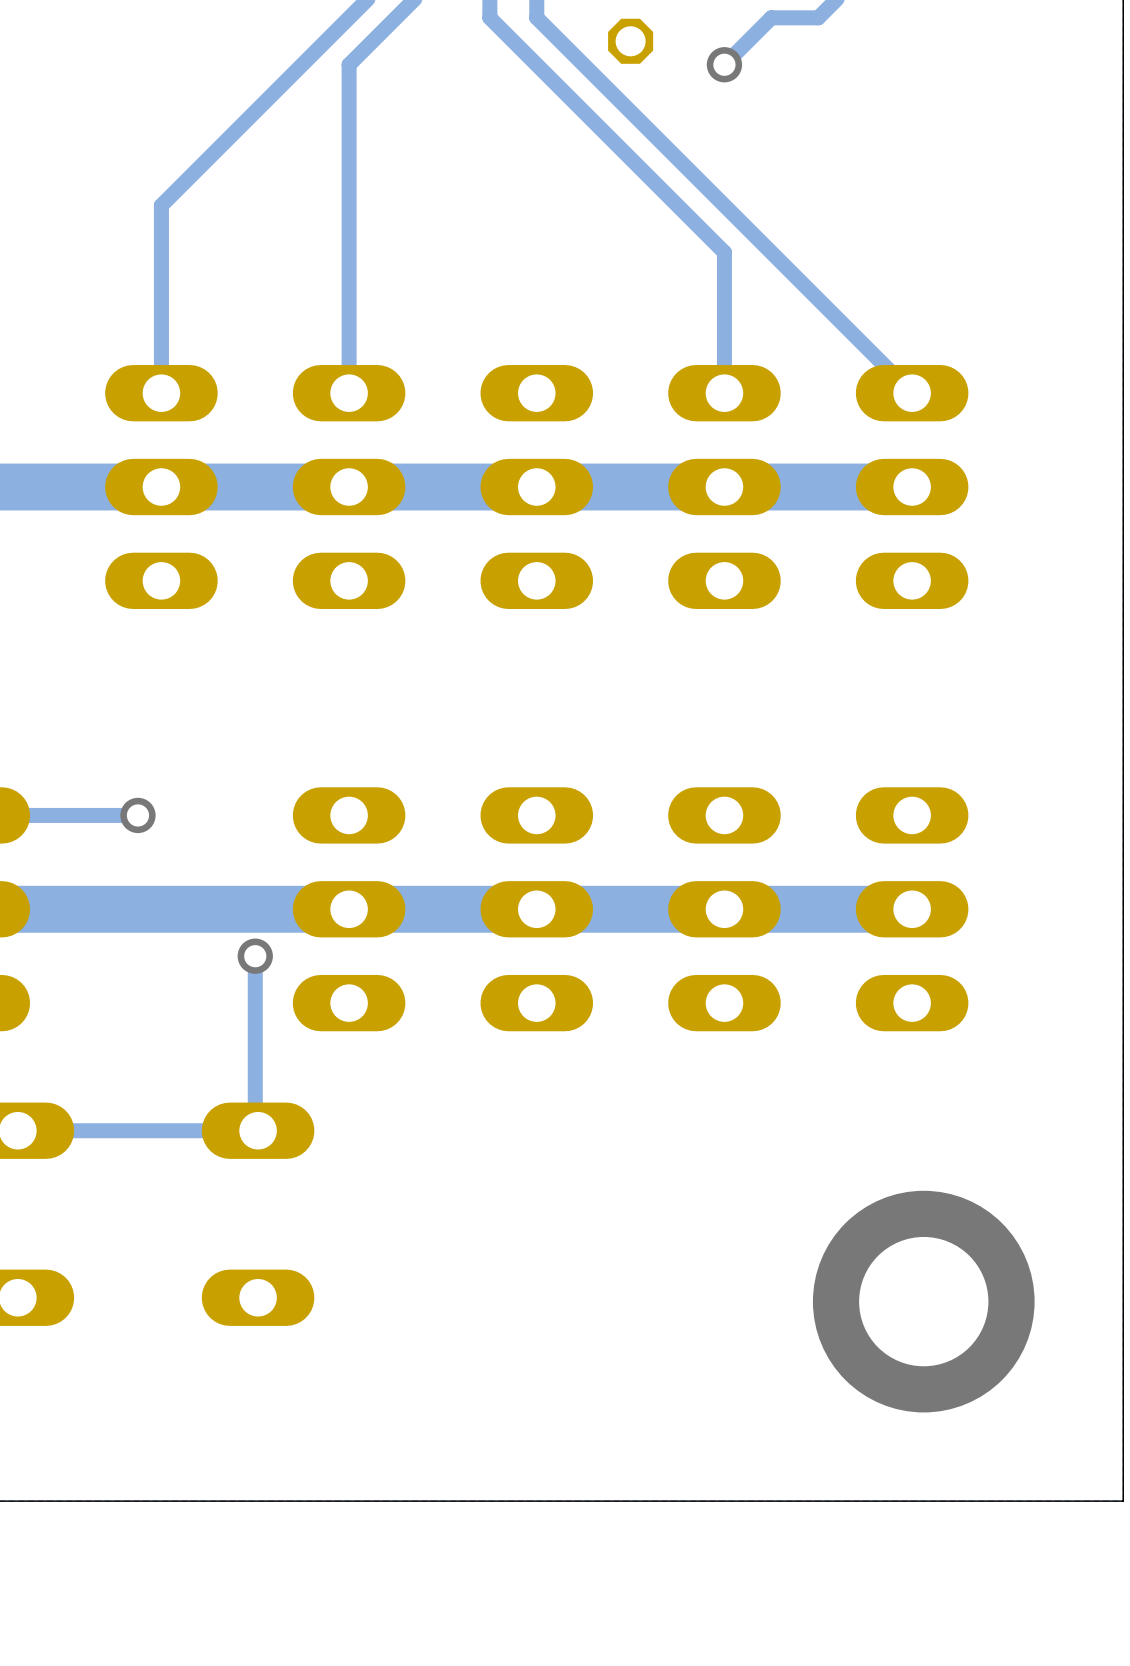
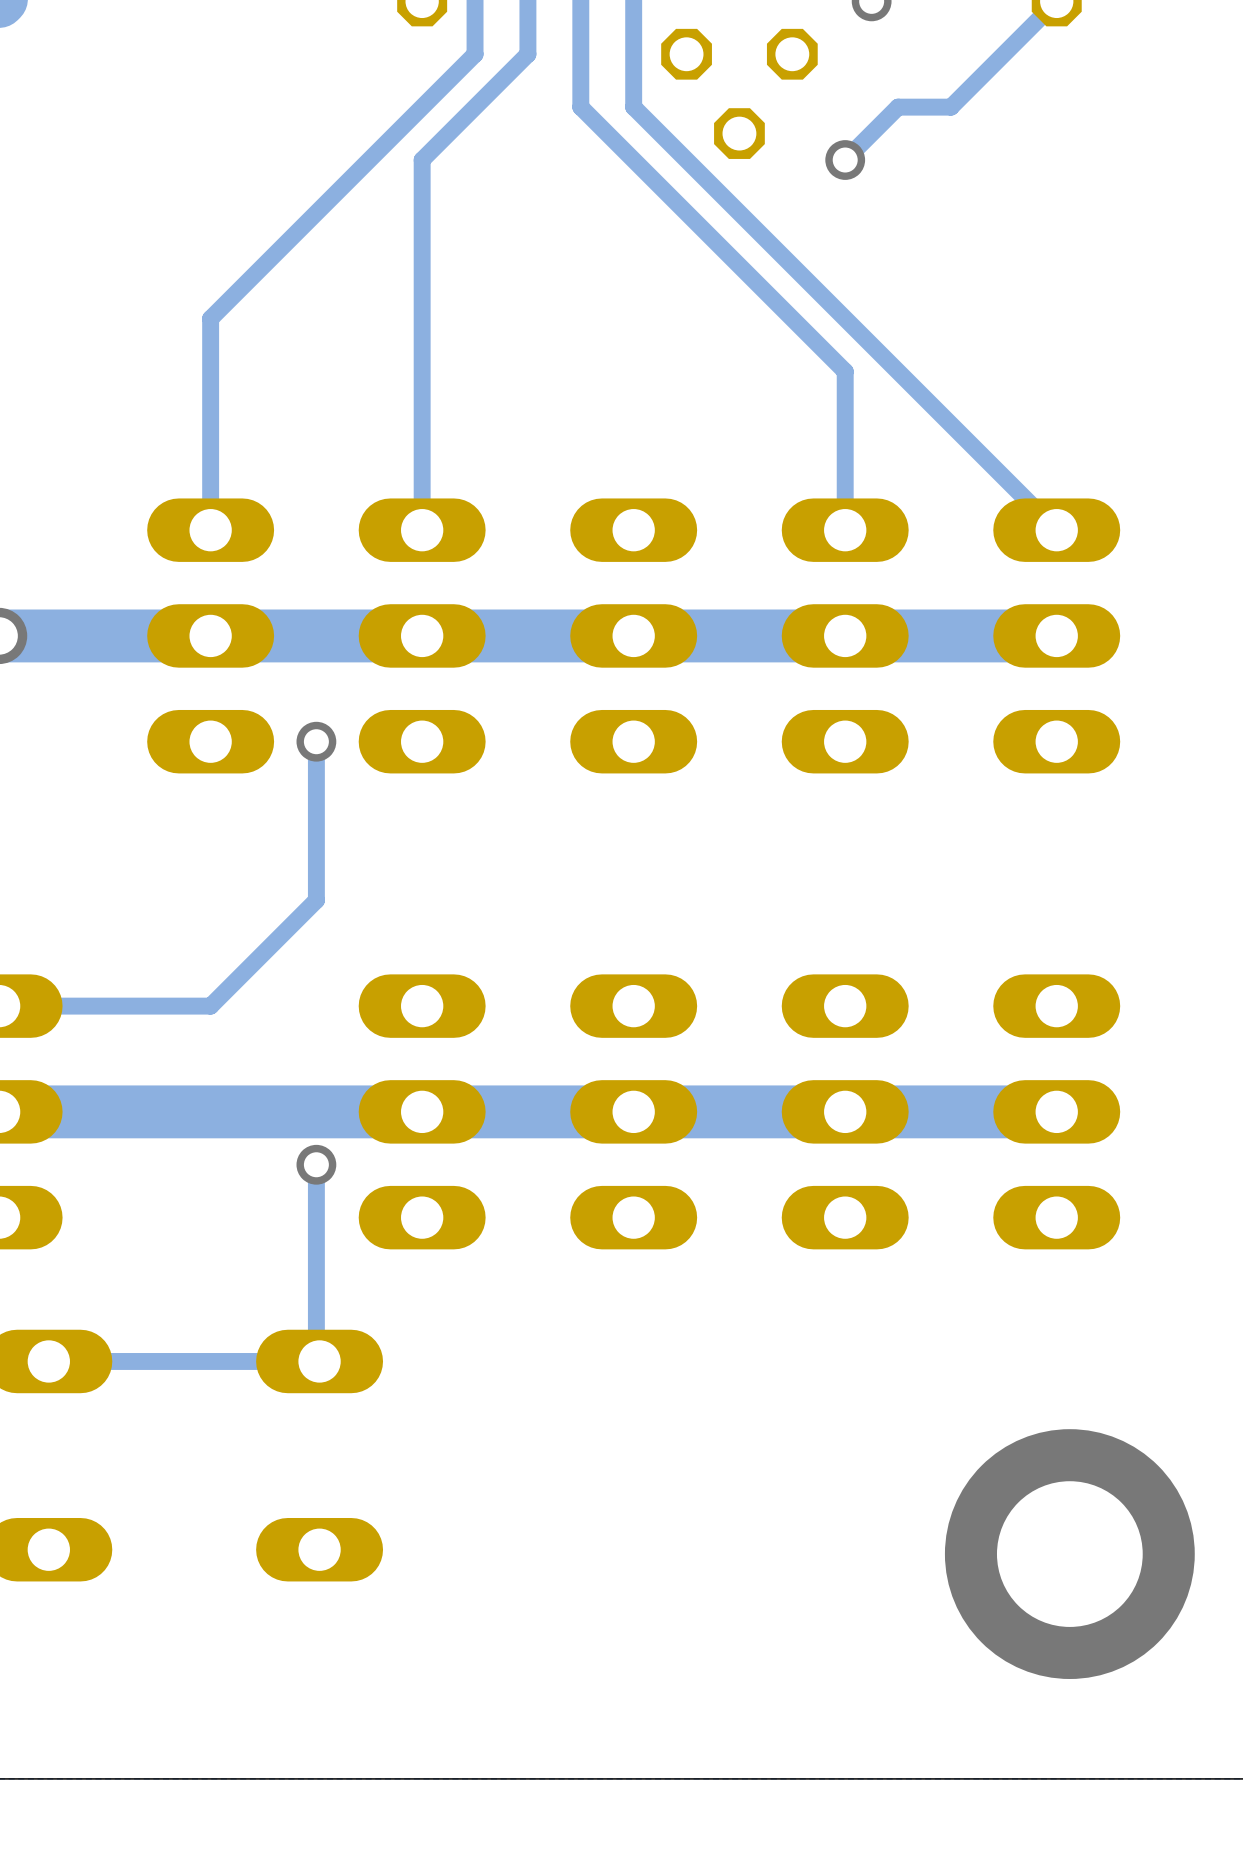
track: none -> (316, 741) (316, 900) (210, 1006) (184, 1006)
via: none -> (316, 741)
via: (137, 815) -> none

